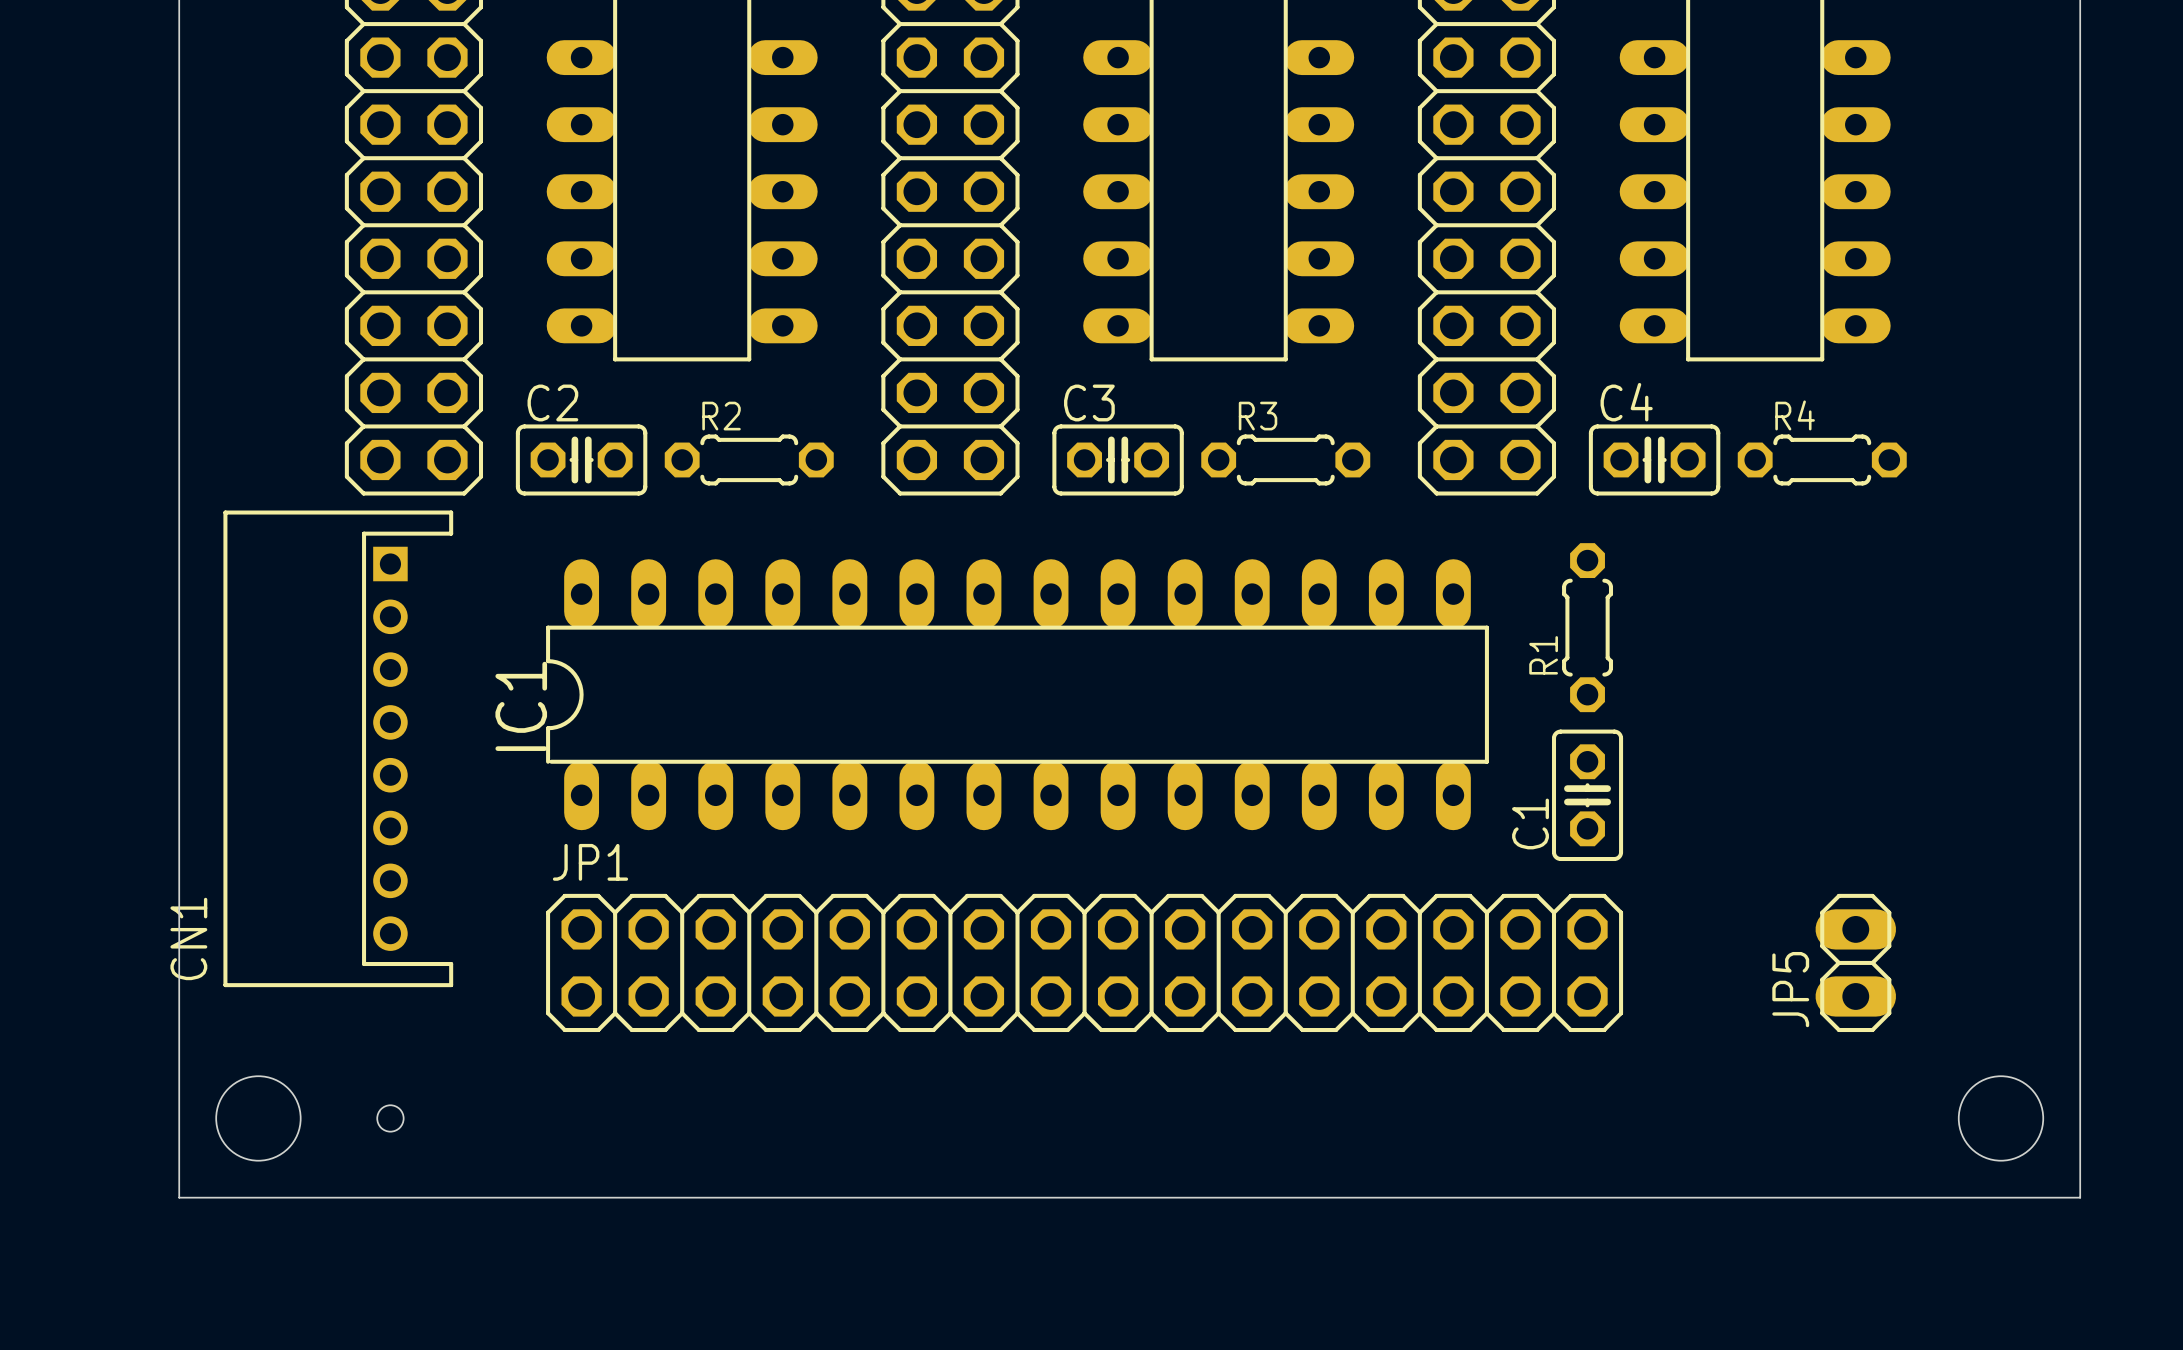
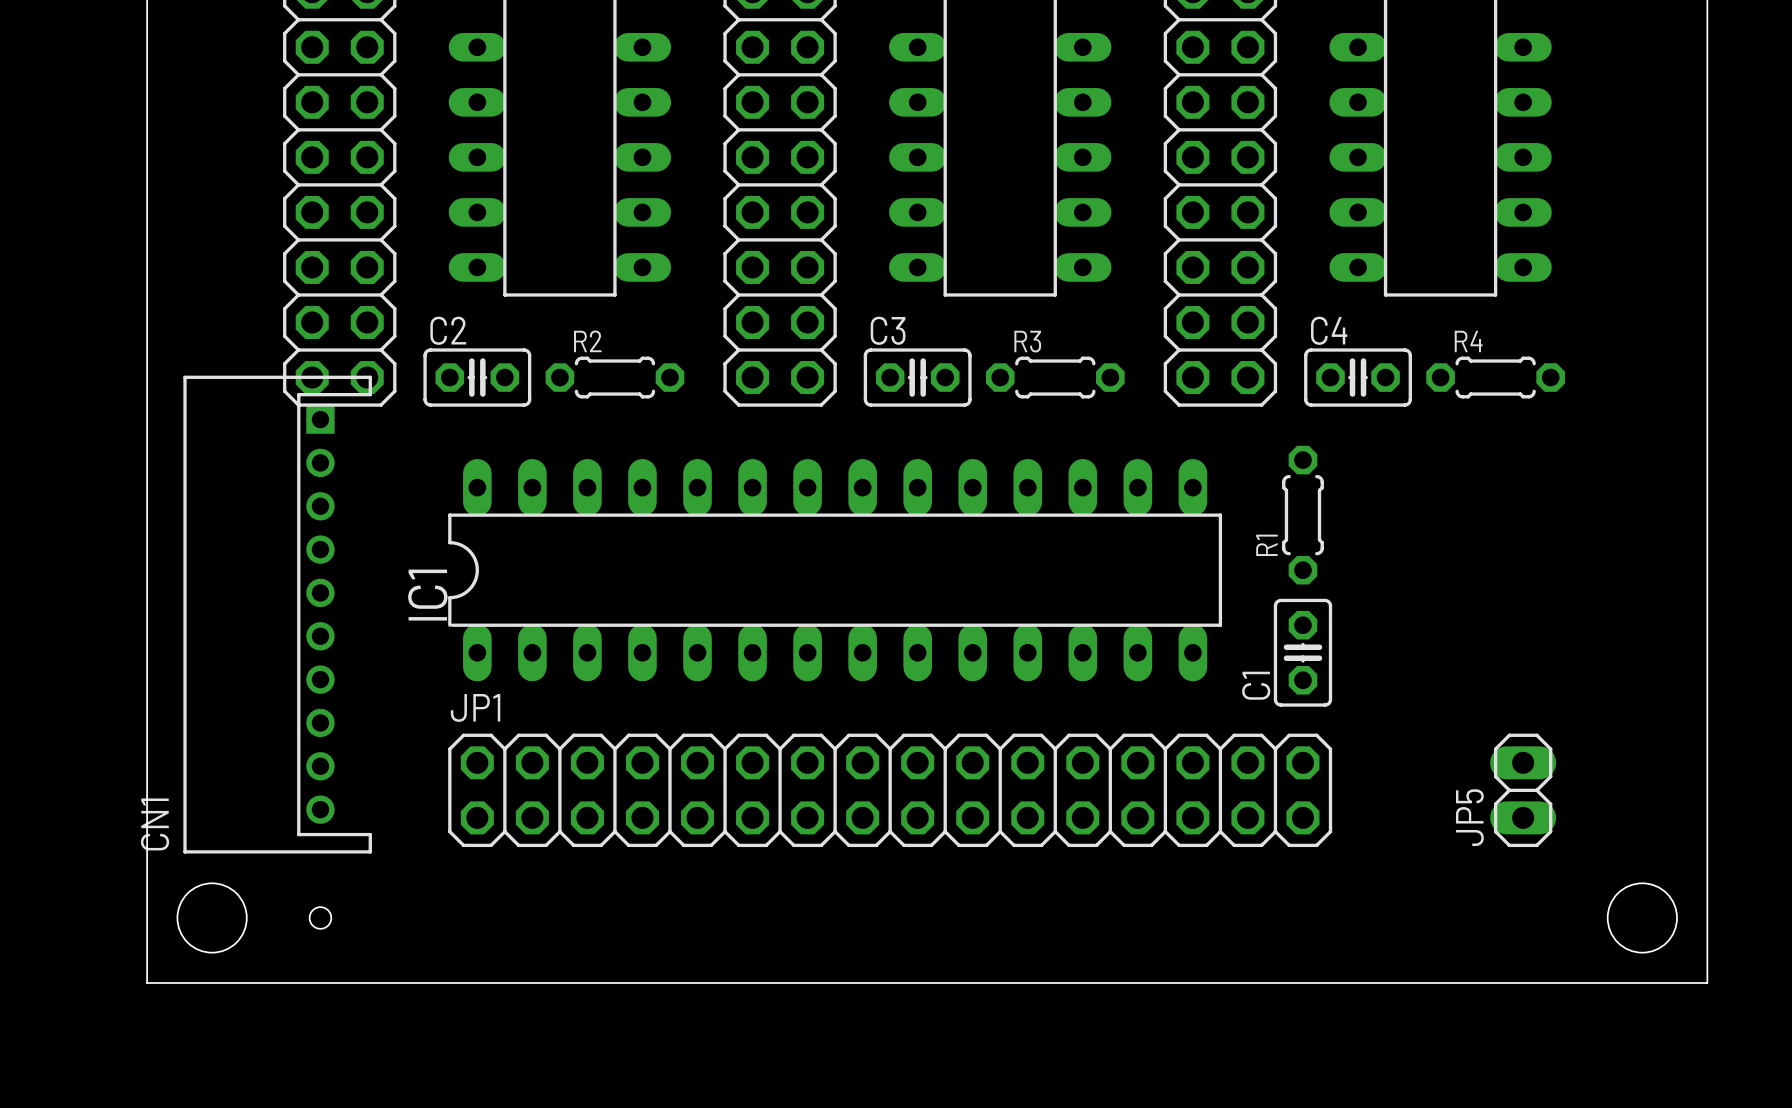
CN1 footprint: [223, 510, 454, 988] -> [183, 375, 372, 854]

